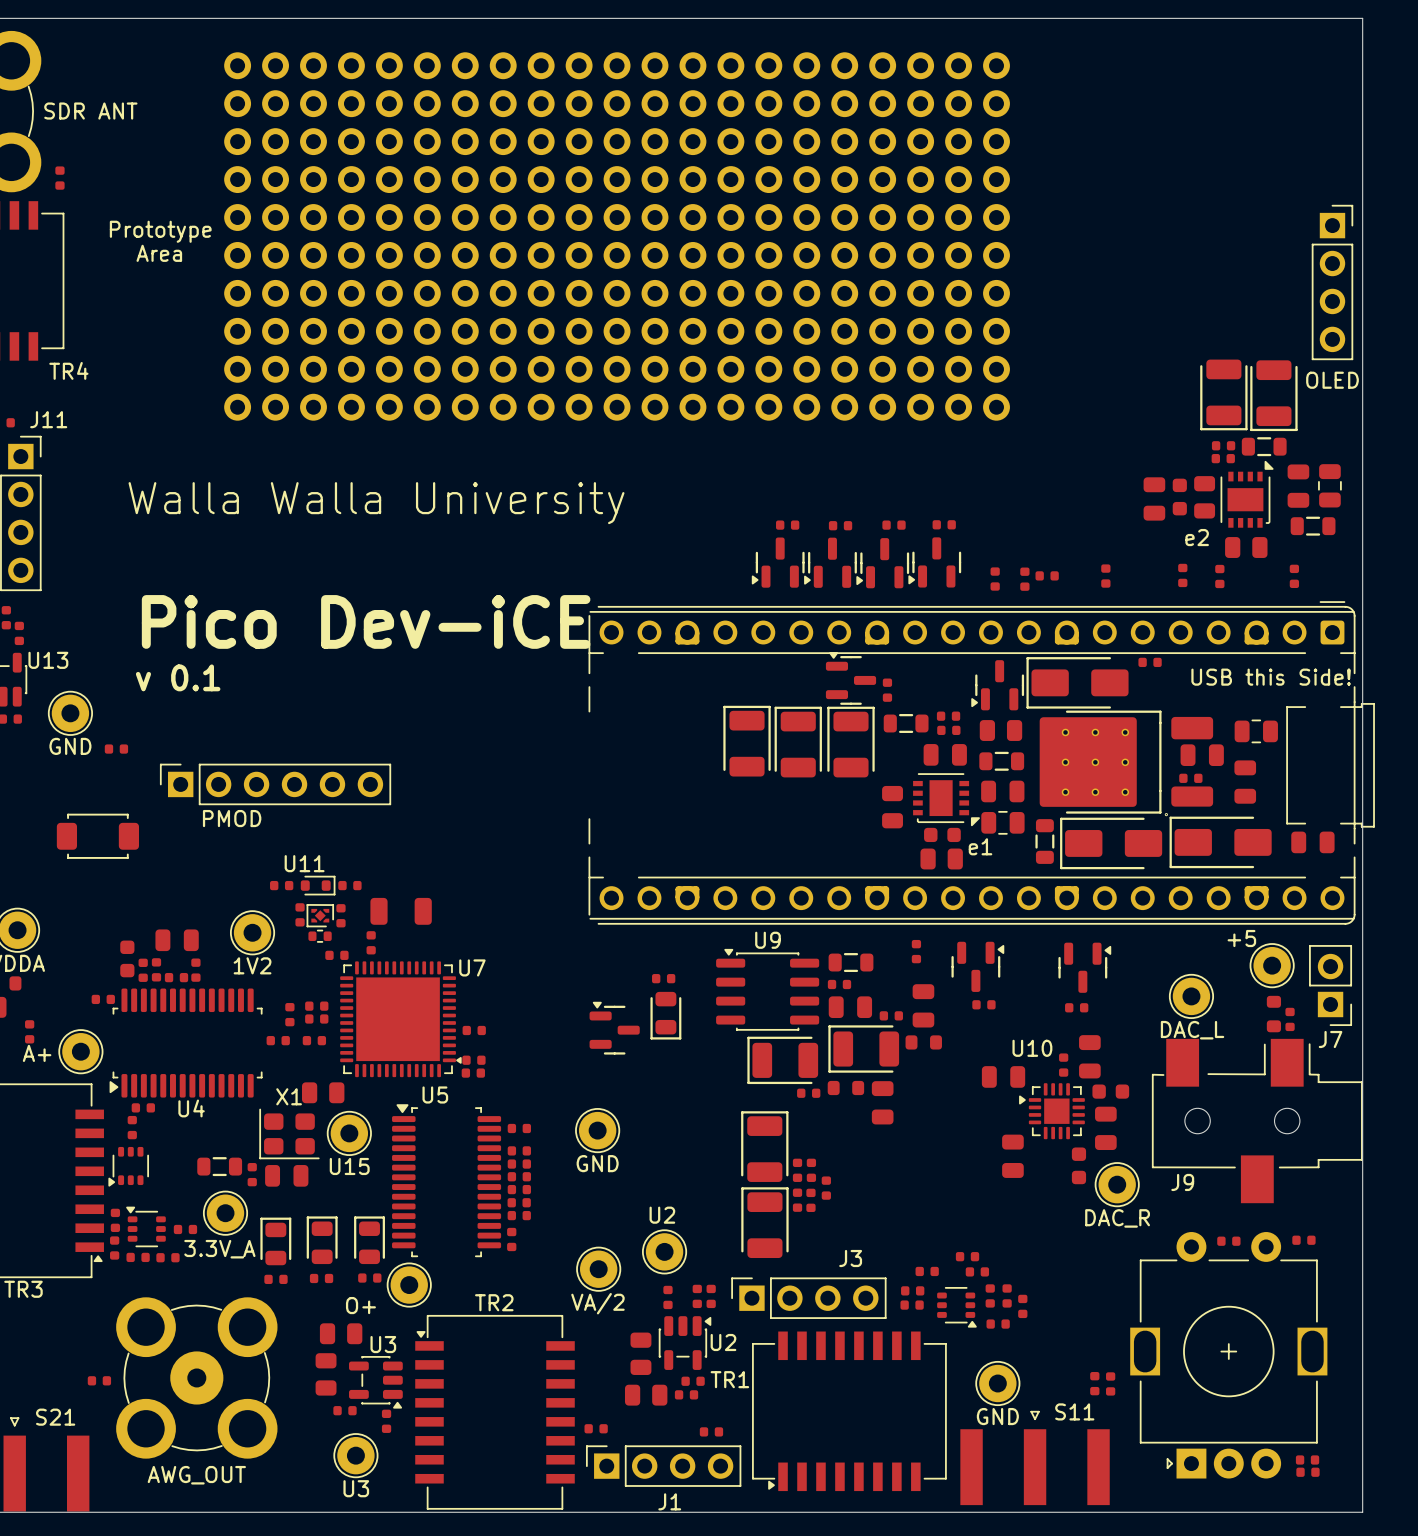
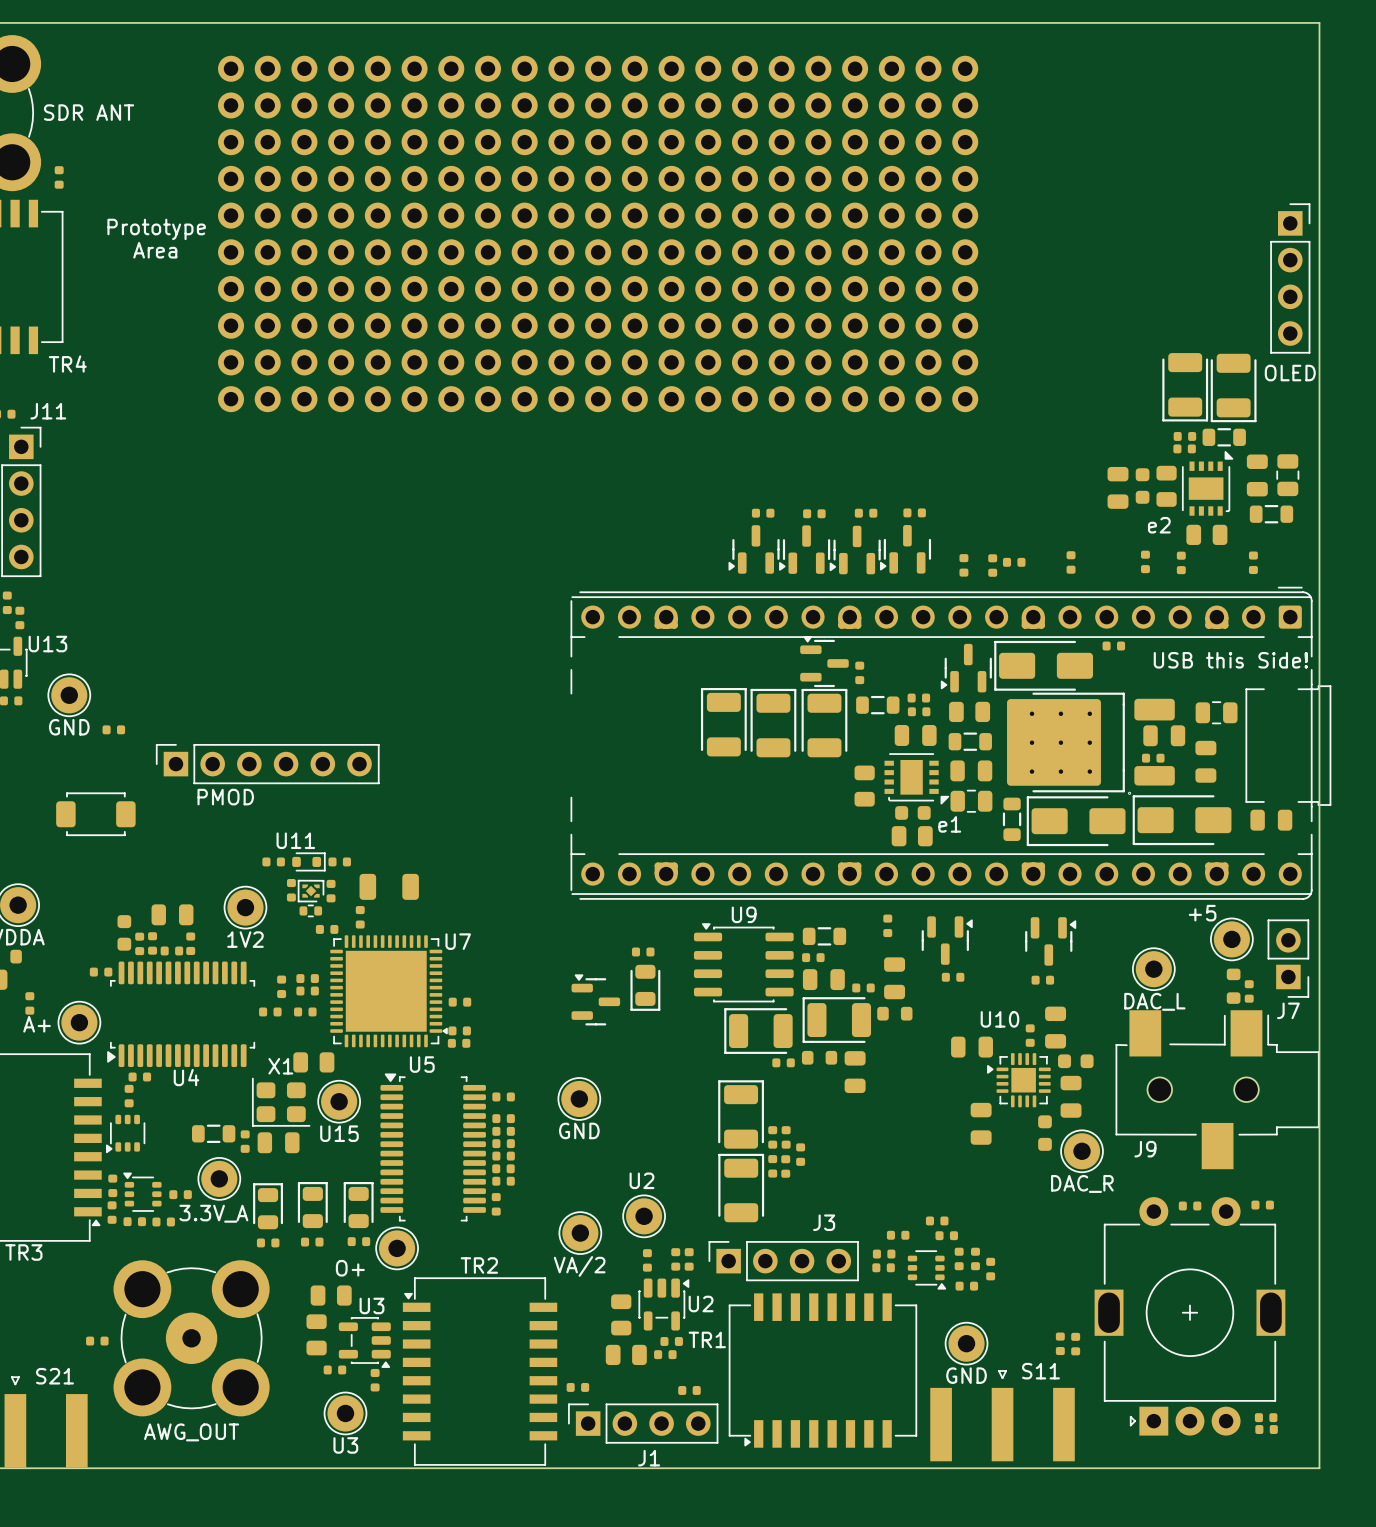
text: Walla Walla University (376, 503) -> none
text: Pico Dev-iCE (366, 621) -> none
text: v 0.1 (178, 677) -> none

